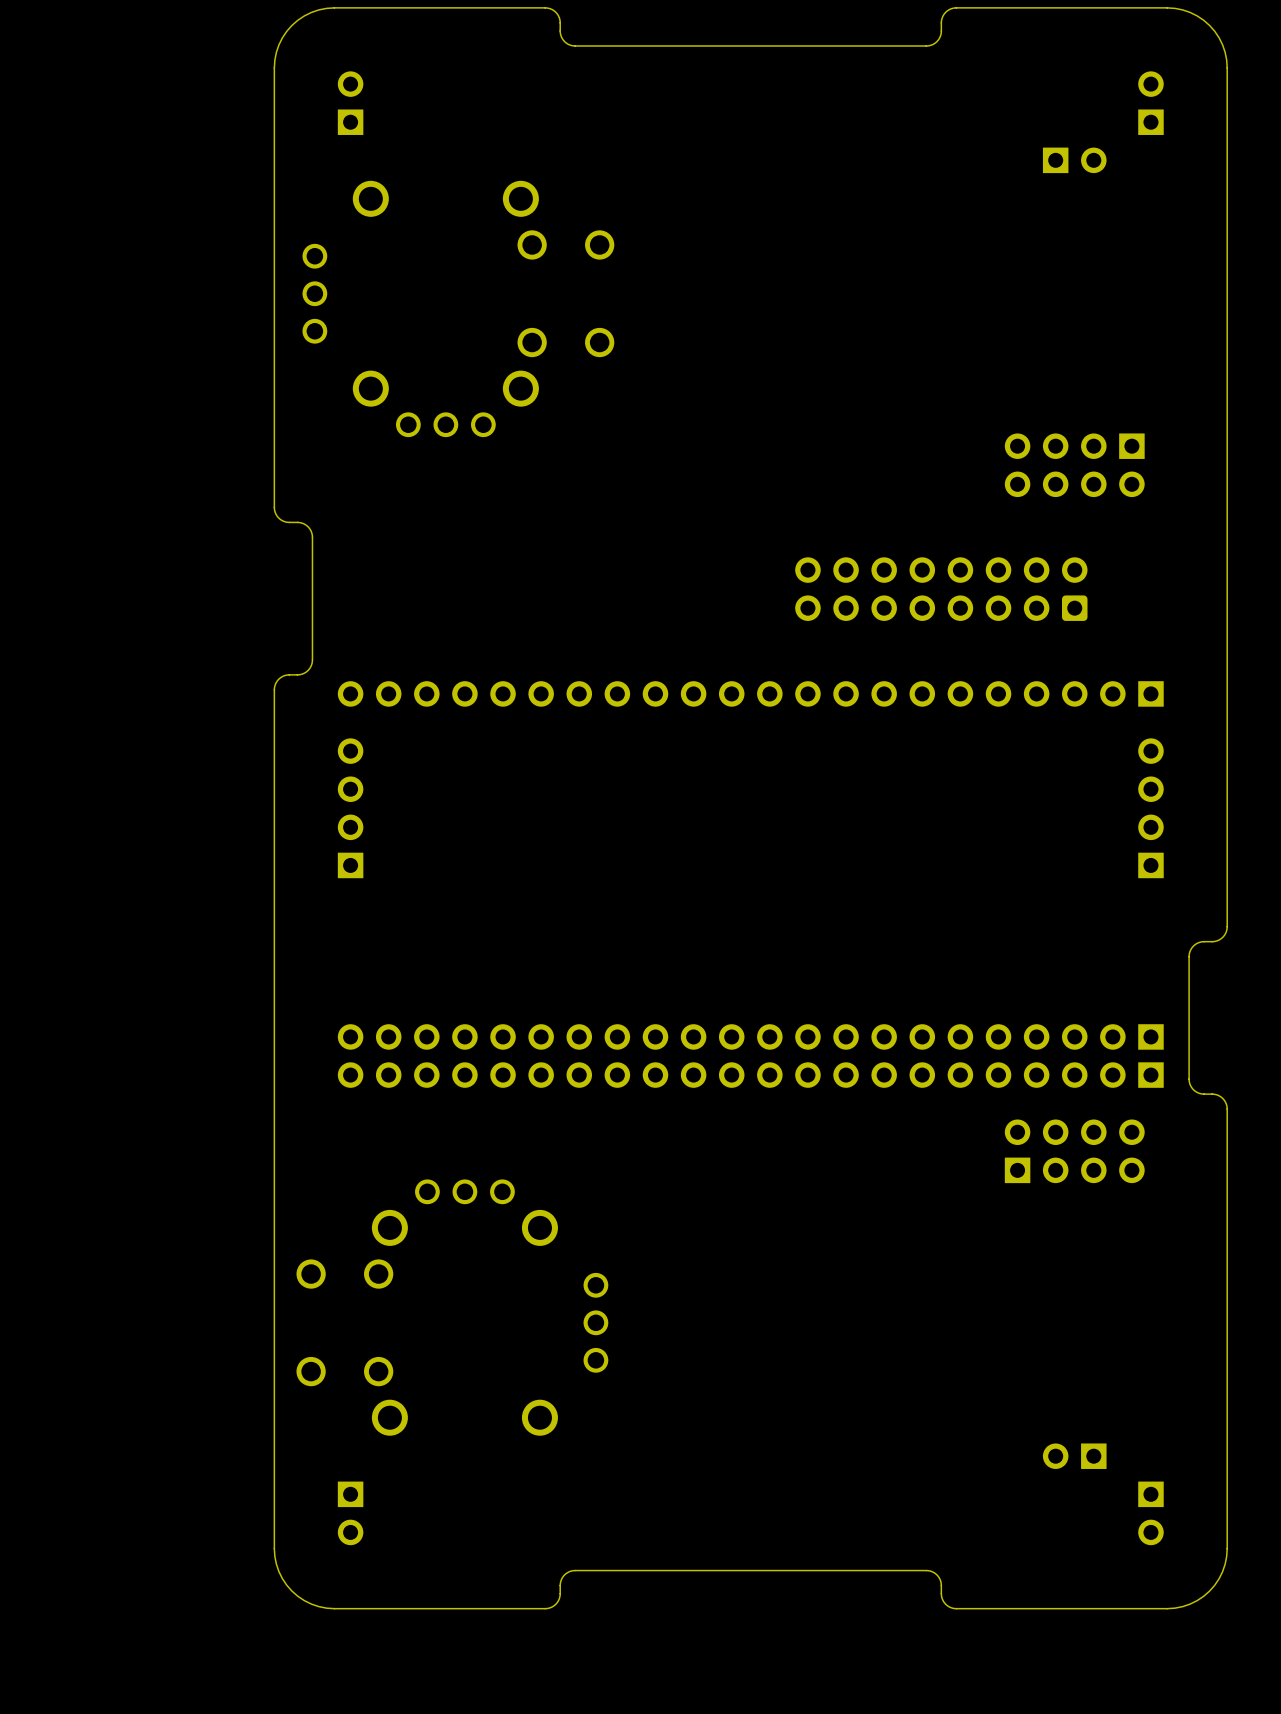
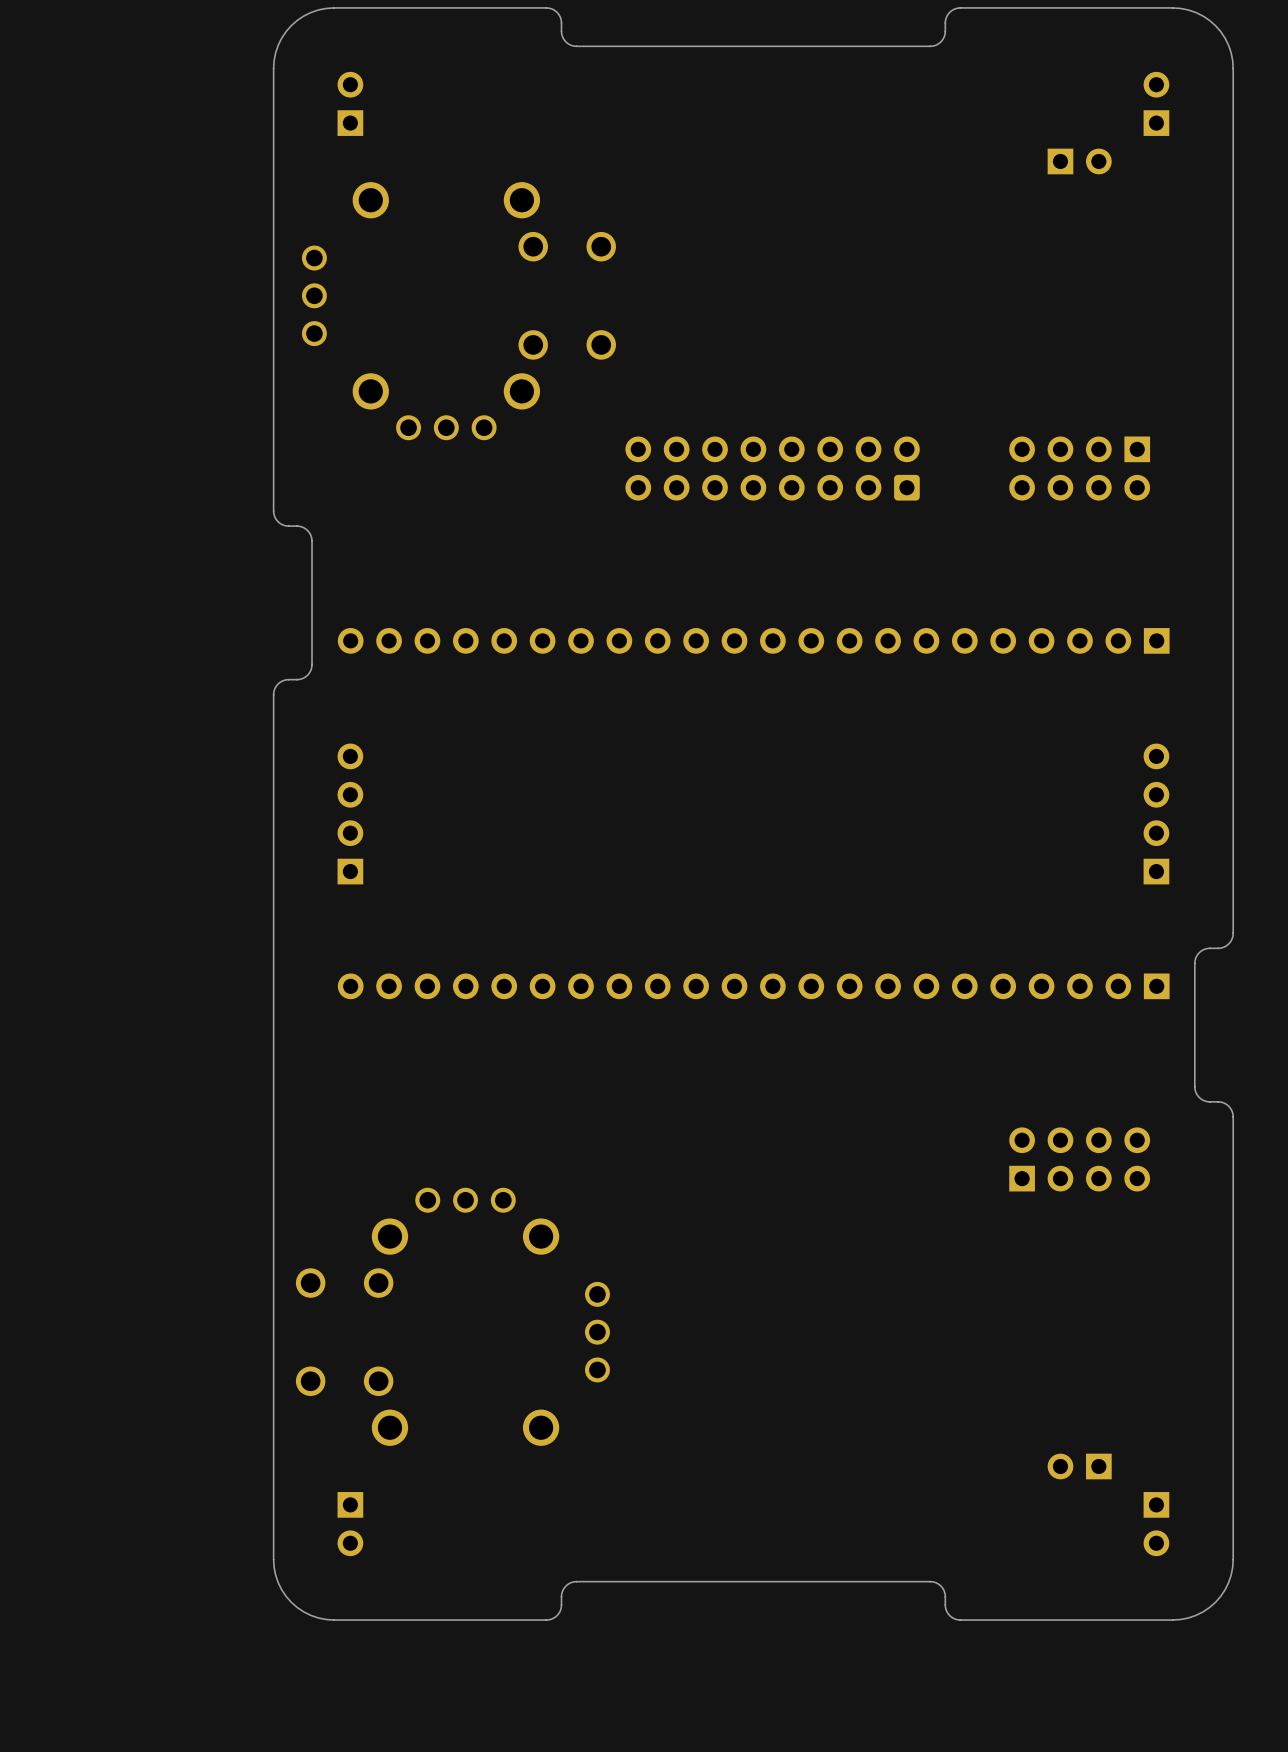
part position: (941, 589) -> (772, 468)
part position: (750, 693) -> (753, 640)
part: none -> (753, 986)
part: (750, 1036) -> none
part: (750, 1075) -> none

